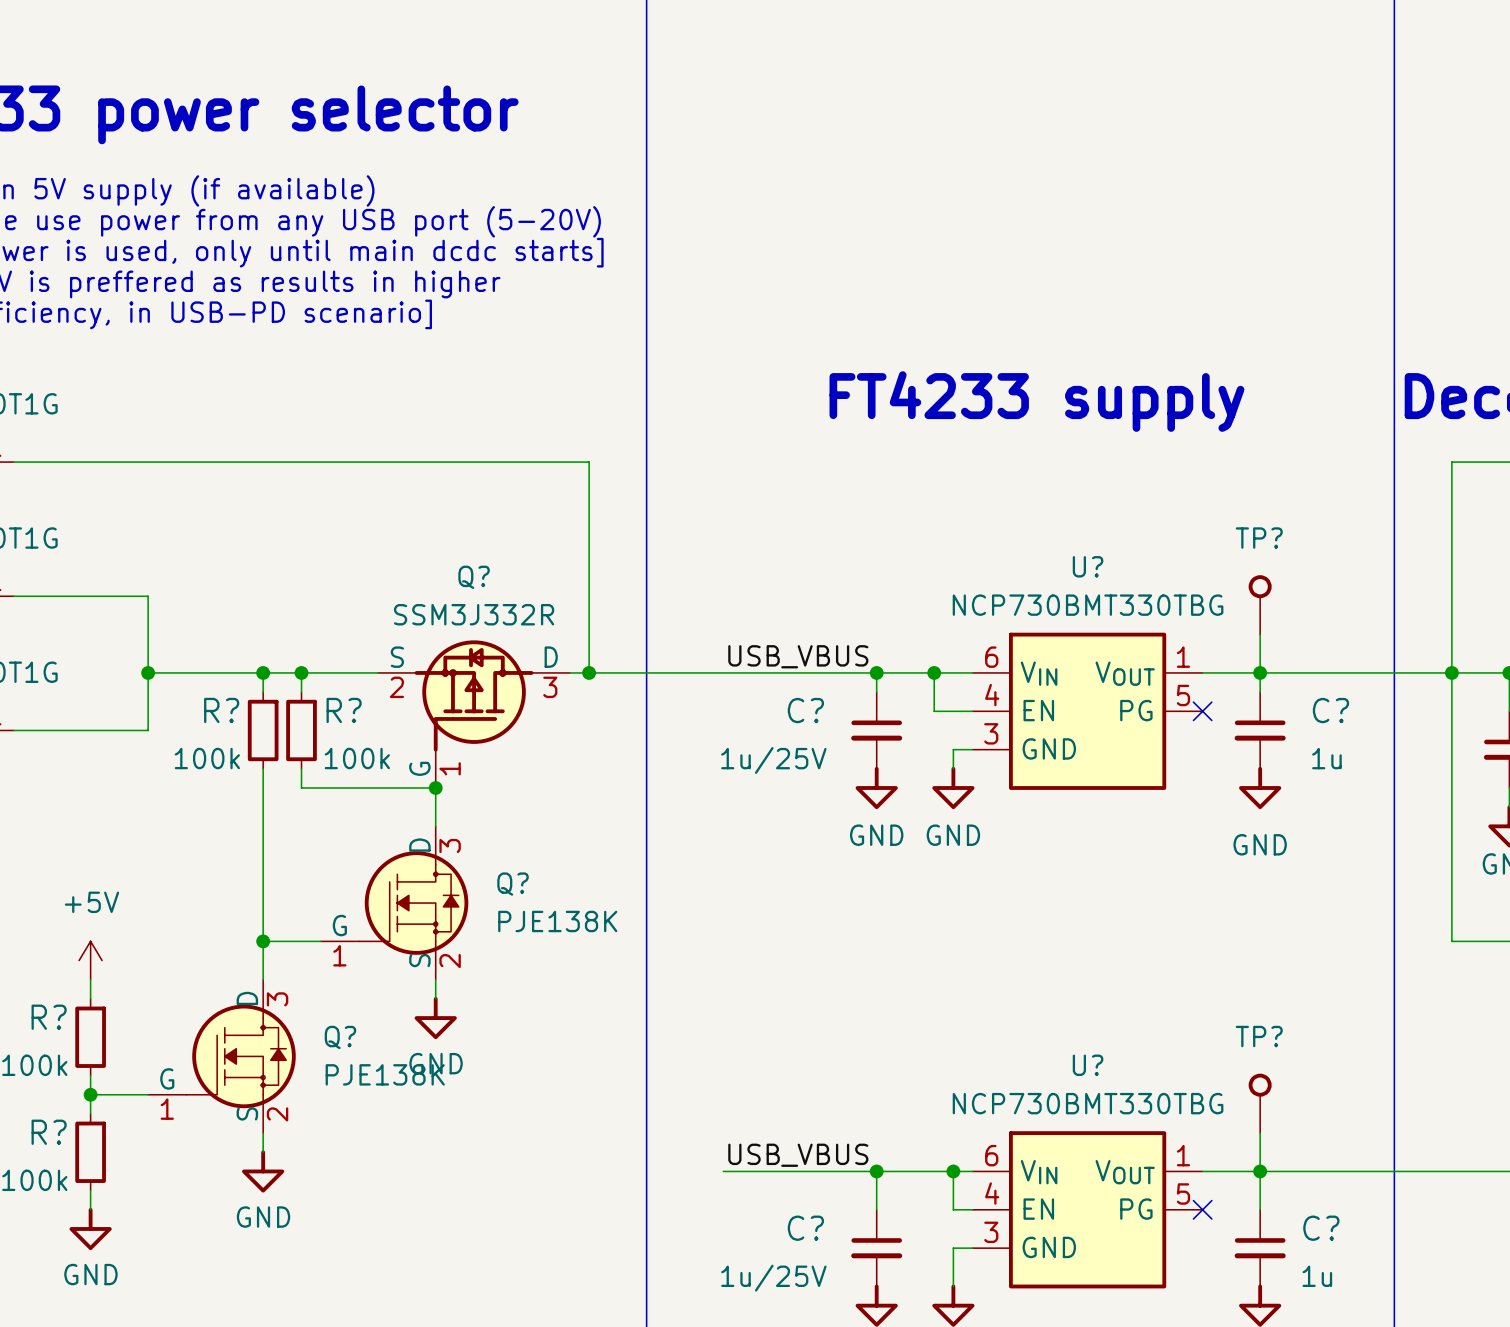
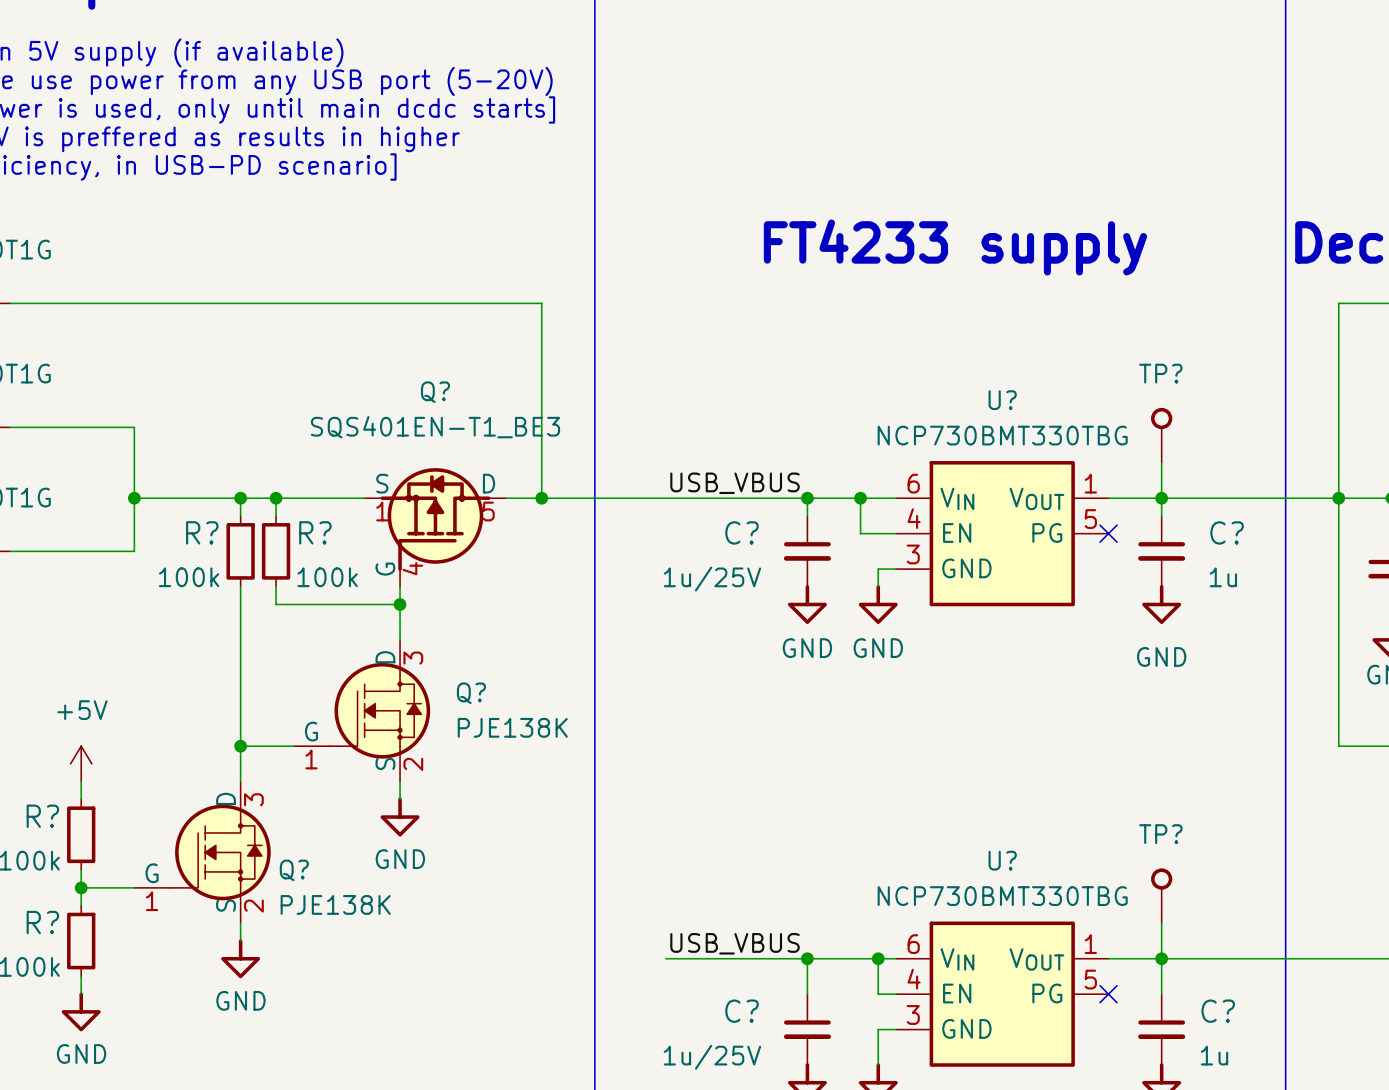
Q? text: none -> SQS401EN-T1_BE3 (435, 427)
Q? value: SSM3J332R (474, 614) -> none
Q? symbol: [378, 640, 570, 789] -> [364, 468, 507, 587]
Q? name position: Q? (340, 1037) -> Q? (294, 870)
Q? value position: PJE138K (385, 1074) -> PJE138K (335, 904)

